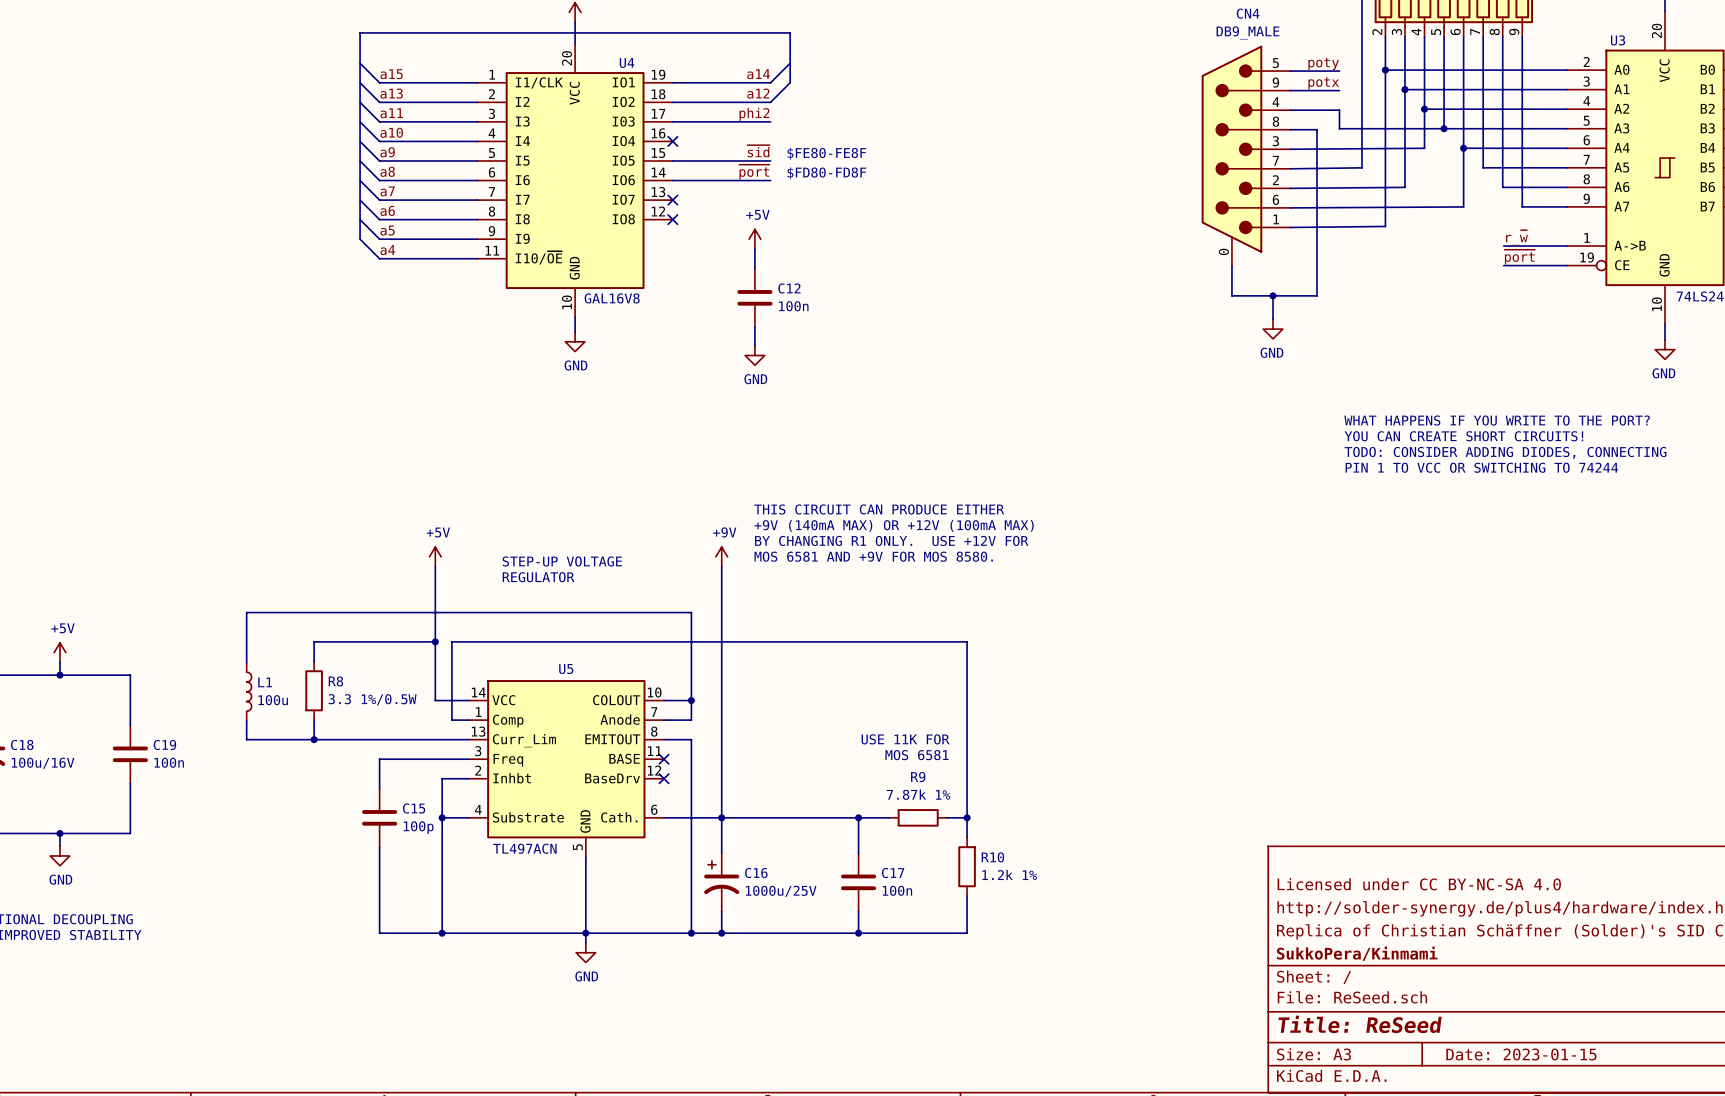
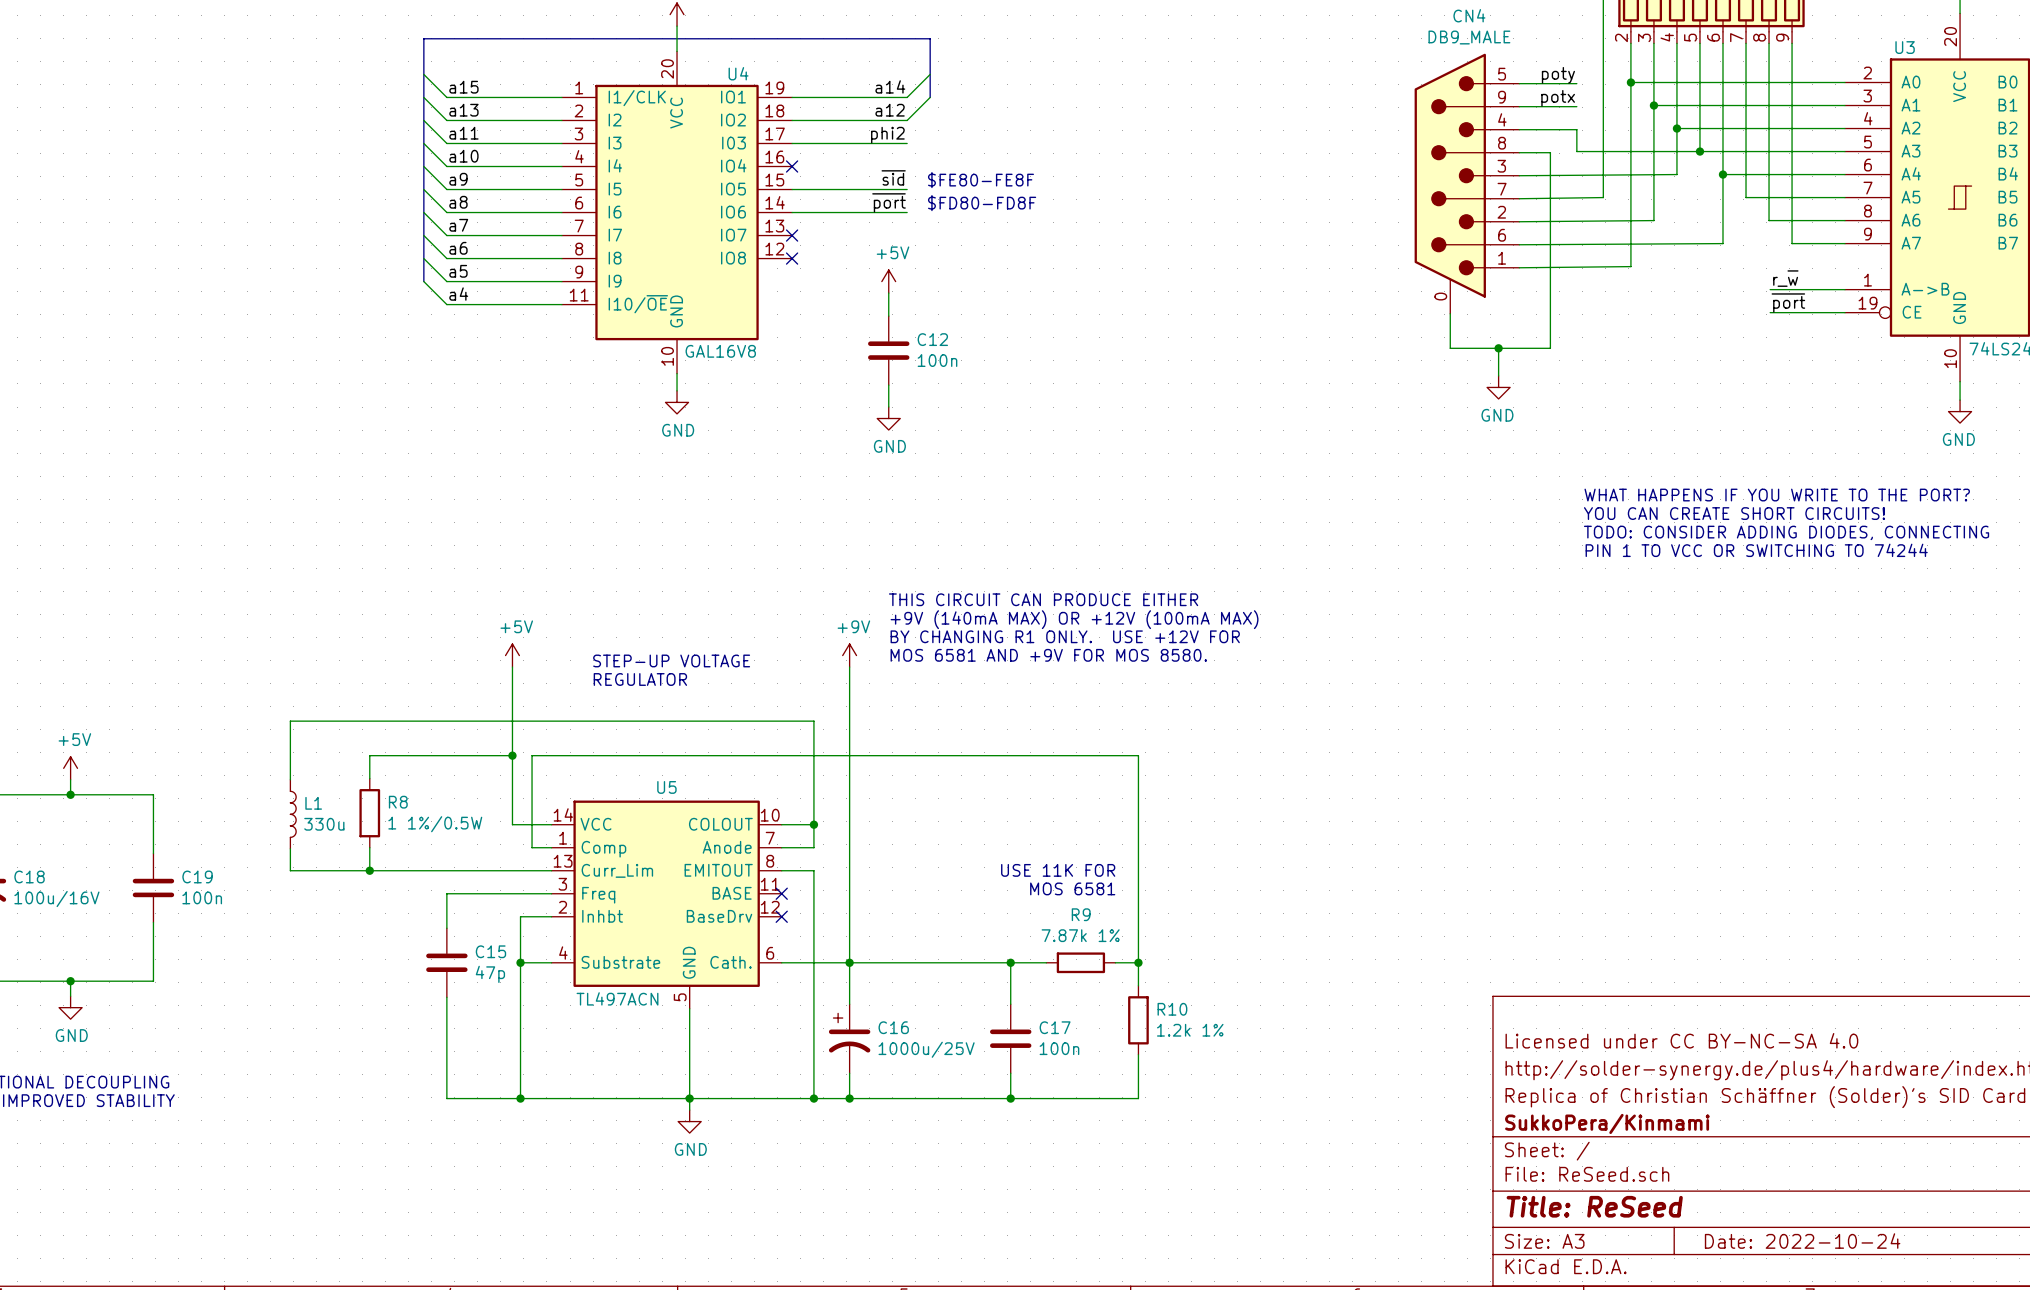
R8 value: 3.3 1%/0.5W (372, 699) -> 1 1%/0.5W (435, 824)
L1 value: 100u (273, 700) -> 330u (324, 824)
C15 value: 100p (418, 827) -> 47p (490, 974)
title block: Date: 2023-01-15 (1521, 1054) -> Date: 2022-10-24 (1802, 1241)

